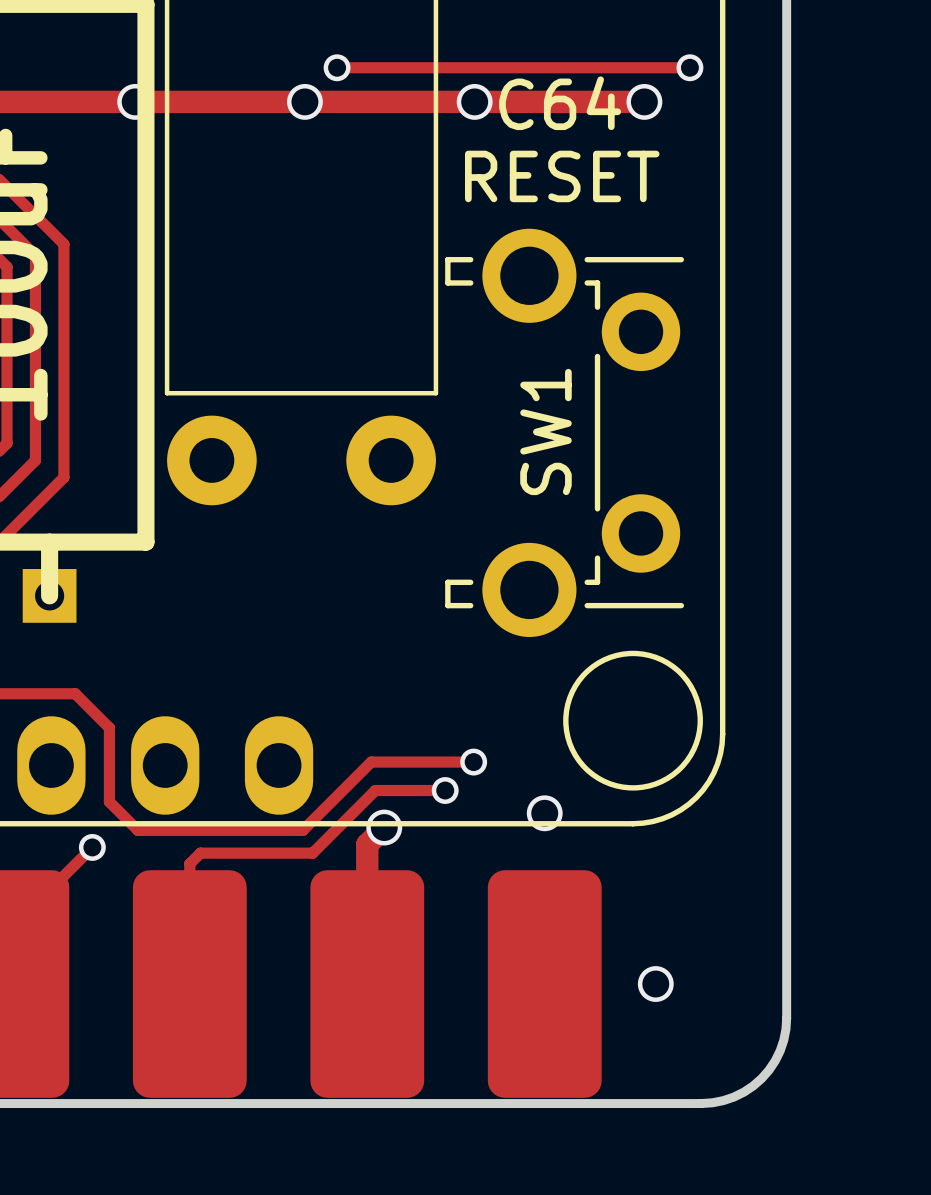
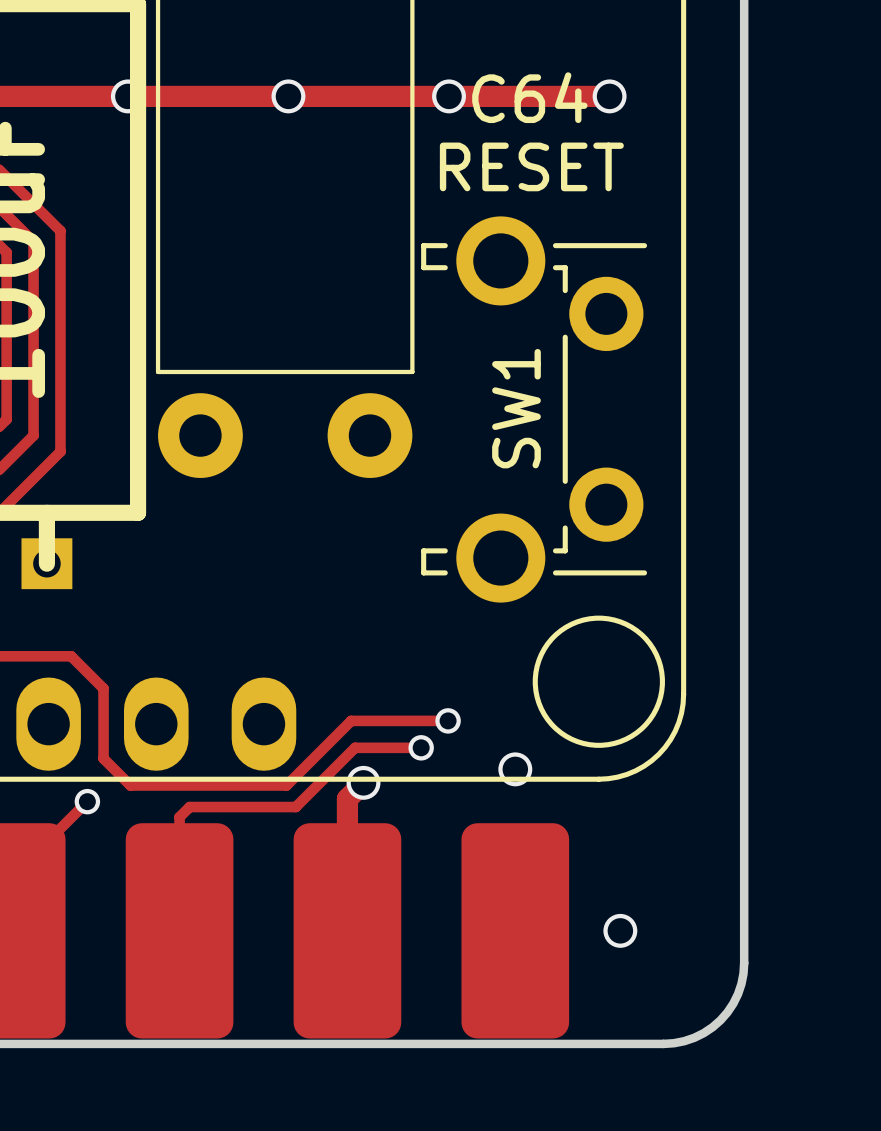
track: (337, 67) (689, 67) -> none
via: (337, 67) -> none
via: (689, 67) -> none

